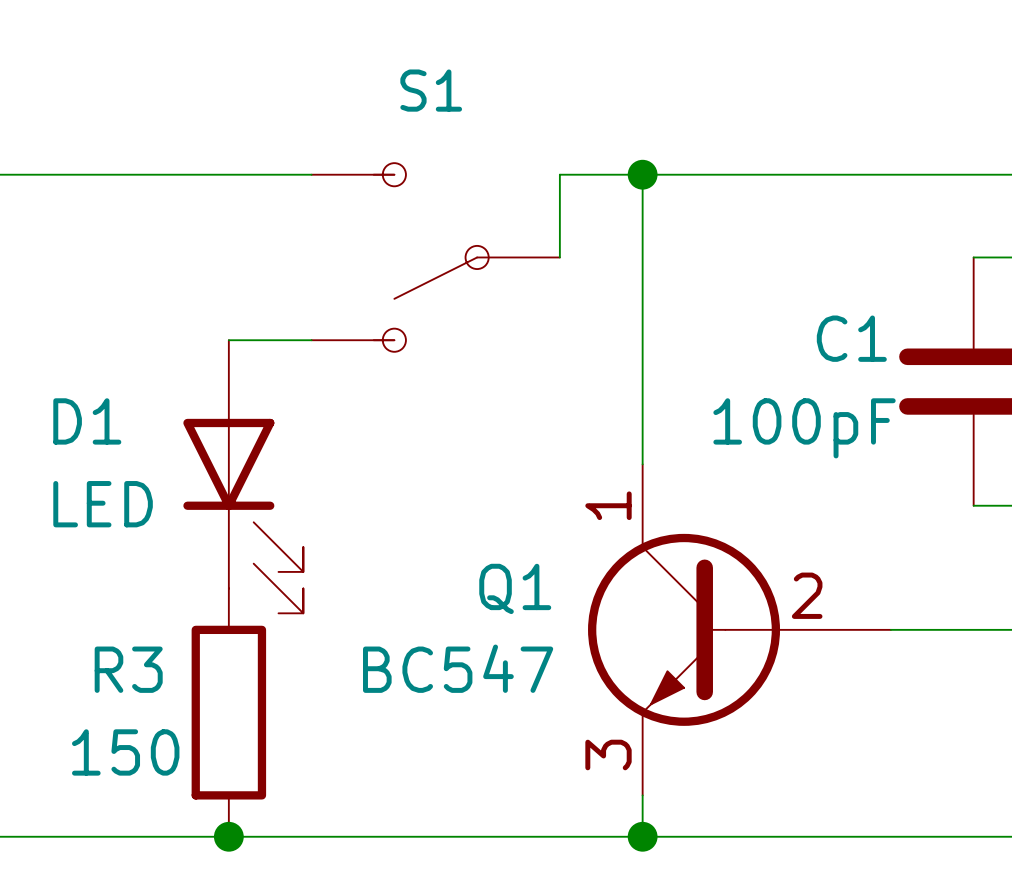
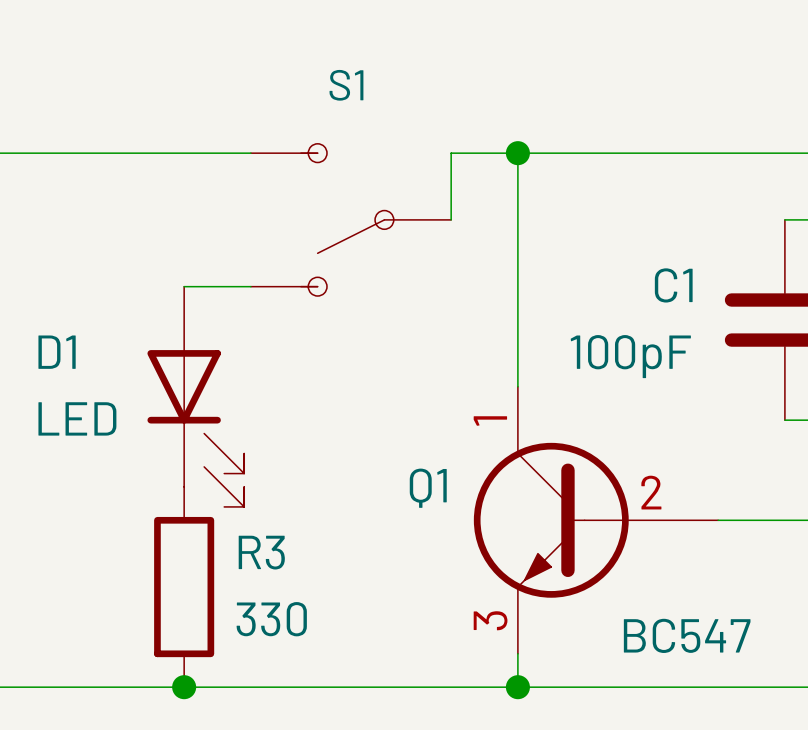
Q1 value position: BC547 (458, 668) -> BC547 (687, 635)
R3 name position: R3 (128, 669) -> R3 (261, 552)
R3 value: 150 (125, 752) -> 330 (271, 619)

